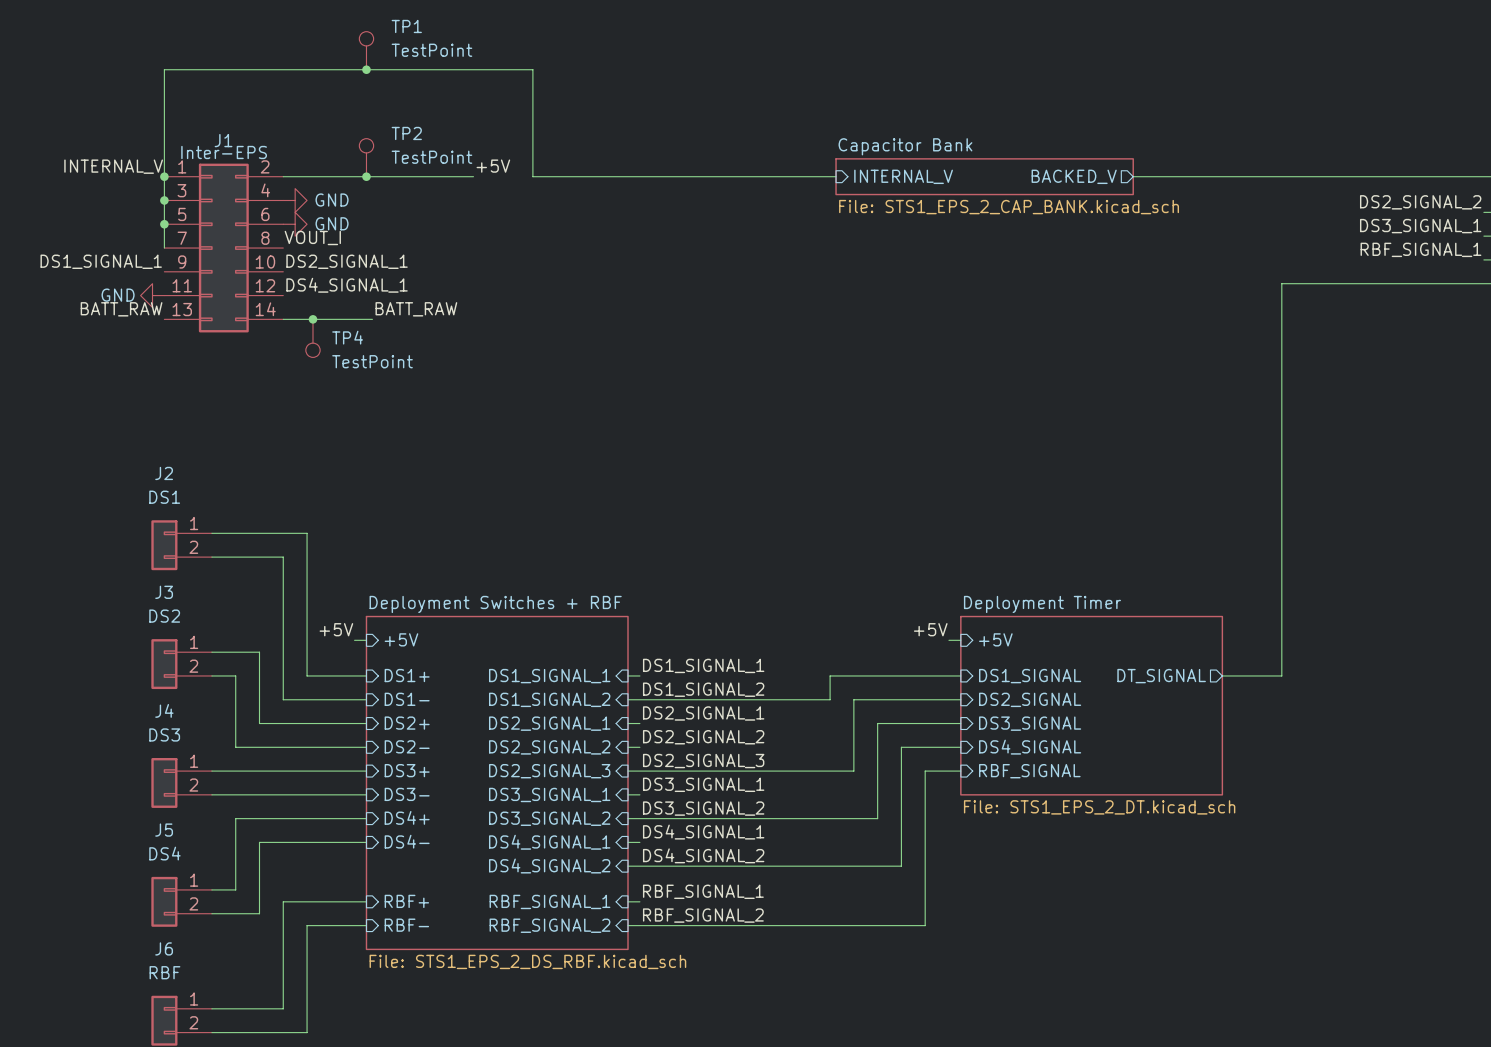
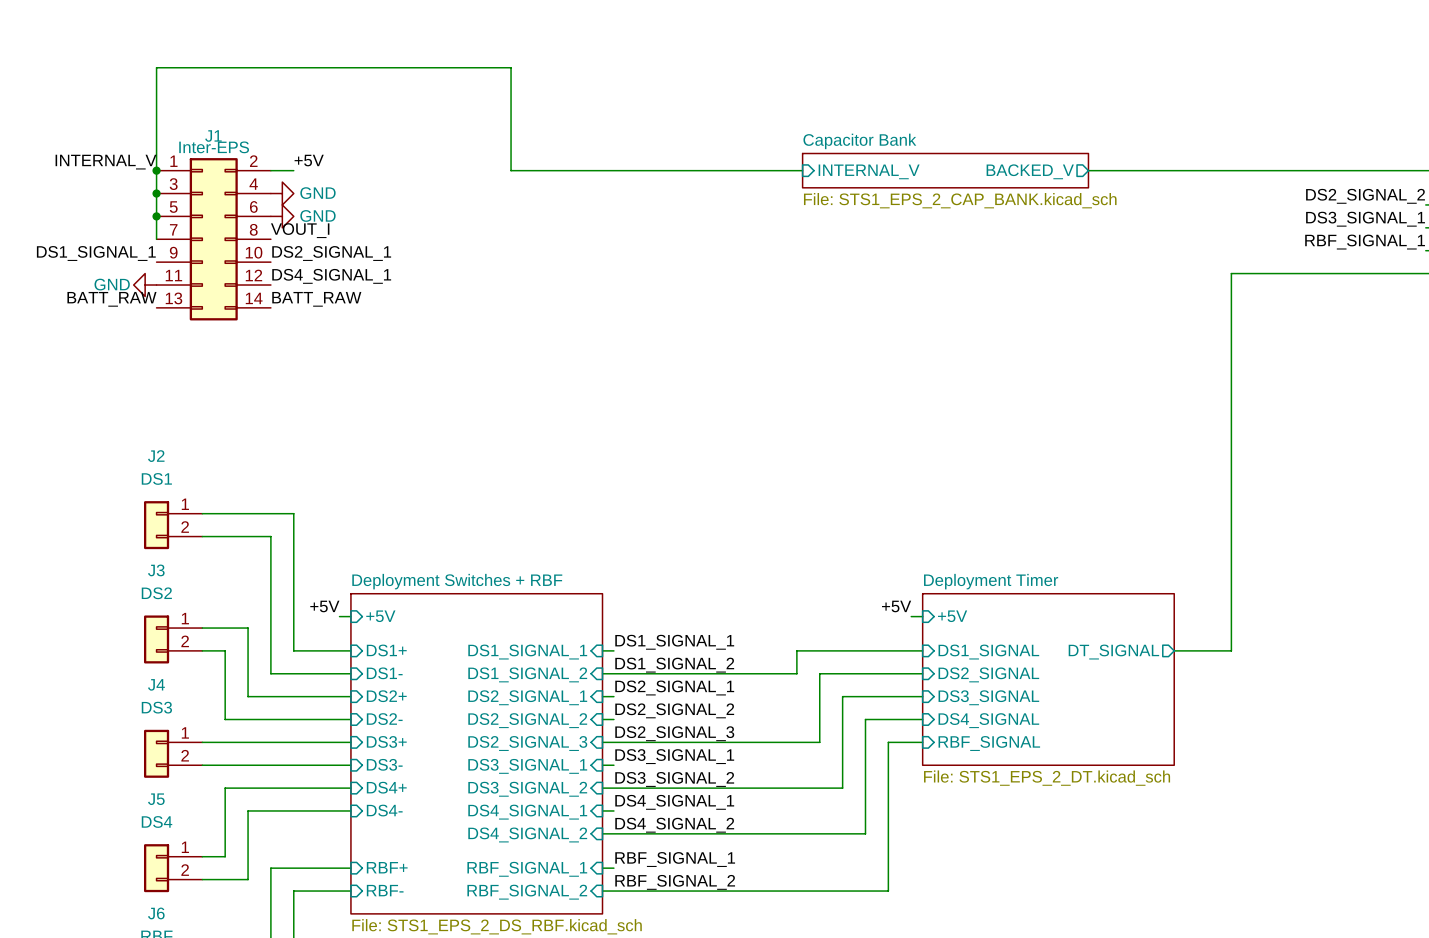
TP1: TestPoint (366, 50) -> none
junction: (366, 69) -> none
TP2: TestPoint (366, 157) -> none
label position: +5V (493, 166) -> +5V (309, 160)
wire: (307, 176) (473, 176) -> none
junction: (366, 176) -> none
label position: BATT_RAW (416, 309) -> BATT_RAW (316, 299)
wire: (283, 319) (372, 319) -> none
junction: (312, 319) -> none
TP4: TestPoint (312, 338) -> none

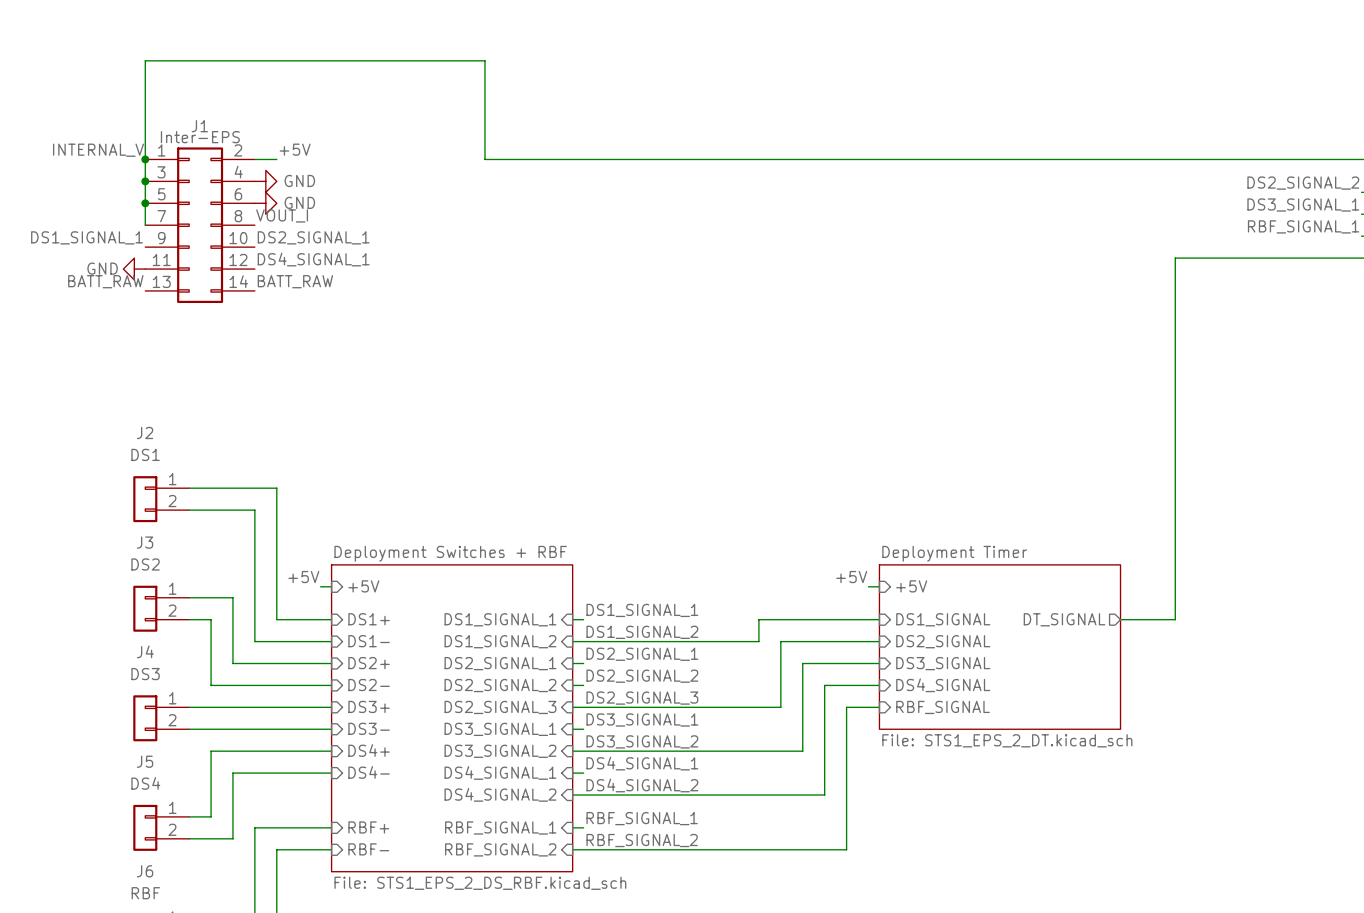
wire: none -> (764, 159) (1038, 159)
sheet Capacitor Bank: File: STS1_EPS_2_CAP_BANK.kicad_sch (945, 170) -> none
sheet pin: INTERNAL_V (869, 171) -> none
sheet pin: BACKED_V (1030, 171) -> none

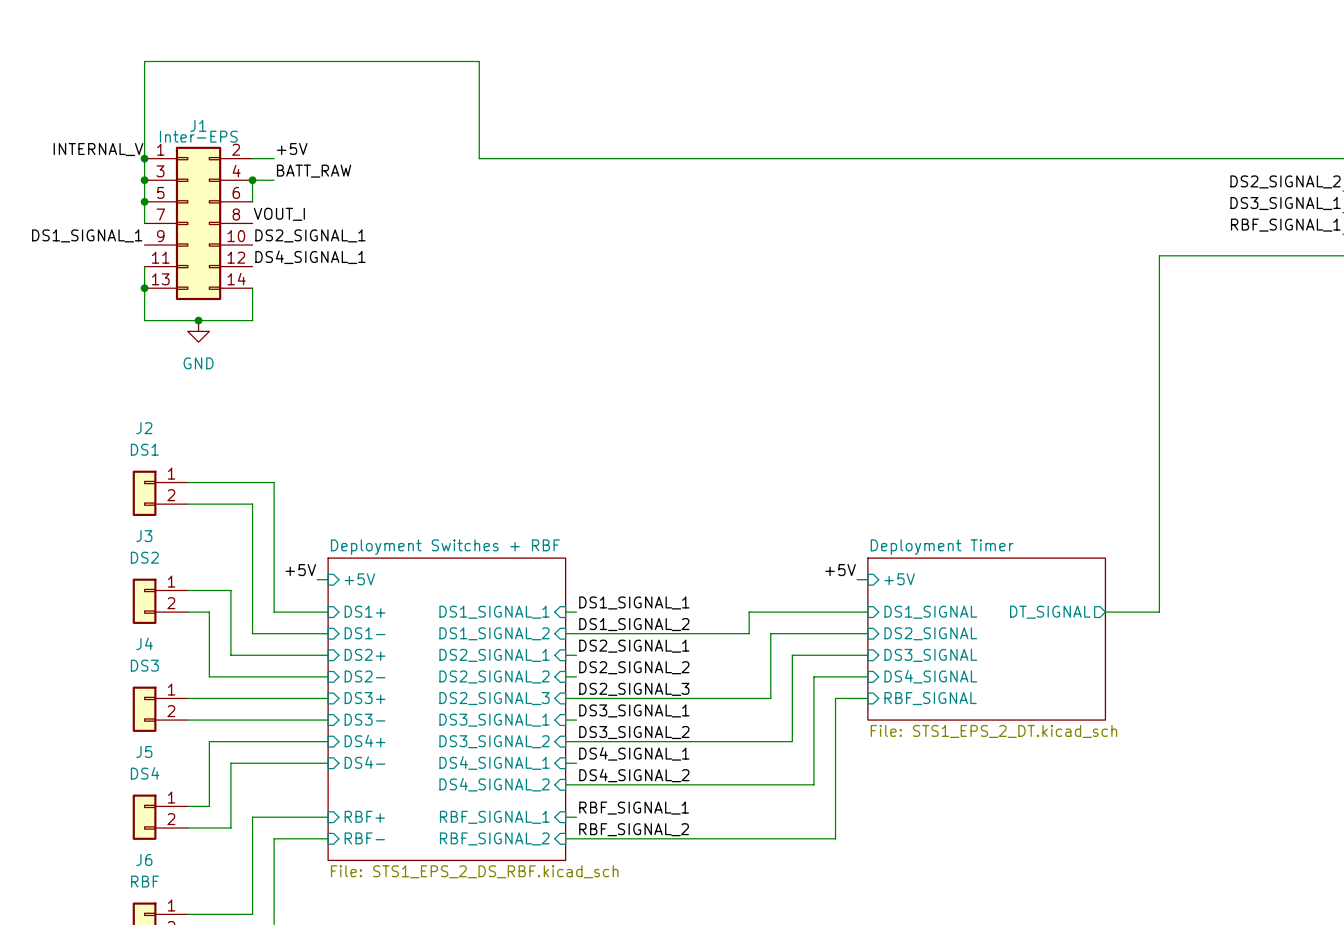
label: none -> BATT_RAW (314, 171)
junction: none -> (252, 180)
power symbol: GND (265, 181) -> none
wire: none -> (274, 180) (252, 180) (252, 201)
power symbol: GND (265, 203) -> none
power symbol: GND (134, 269) -> none
wire: none -> (144, 266) (144, 320) (252, 320) (252, 288)
label: BATT_RAW (105, 281) -> none
label: BATT_RAW (295, 281) -> none
junction: none -> (144, 288)
junction: none -> (198, 320)
power symbol: none -> GND (198, 331)

